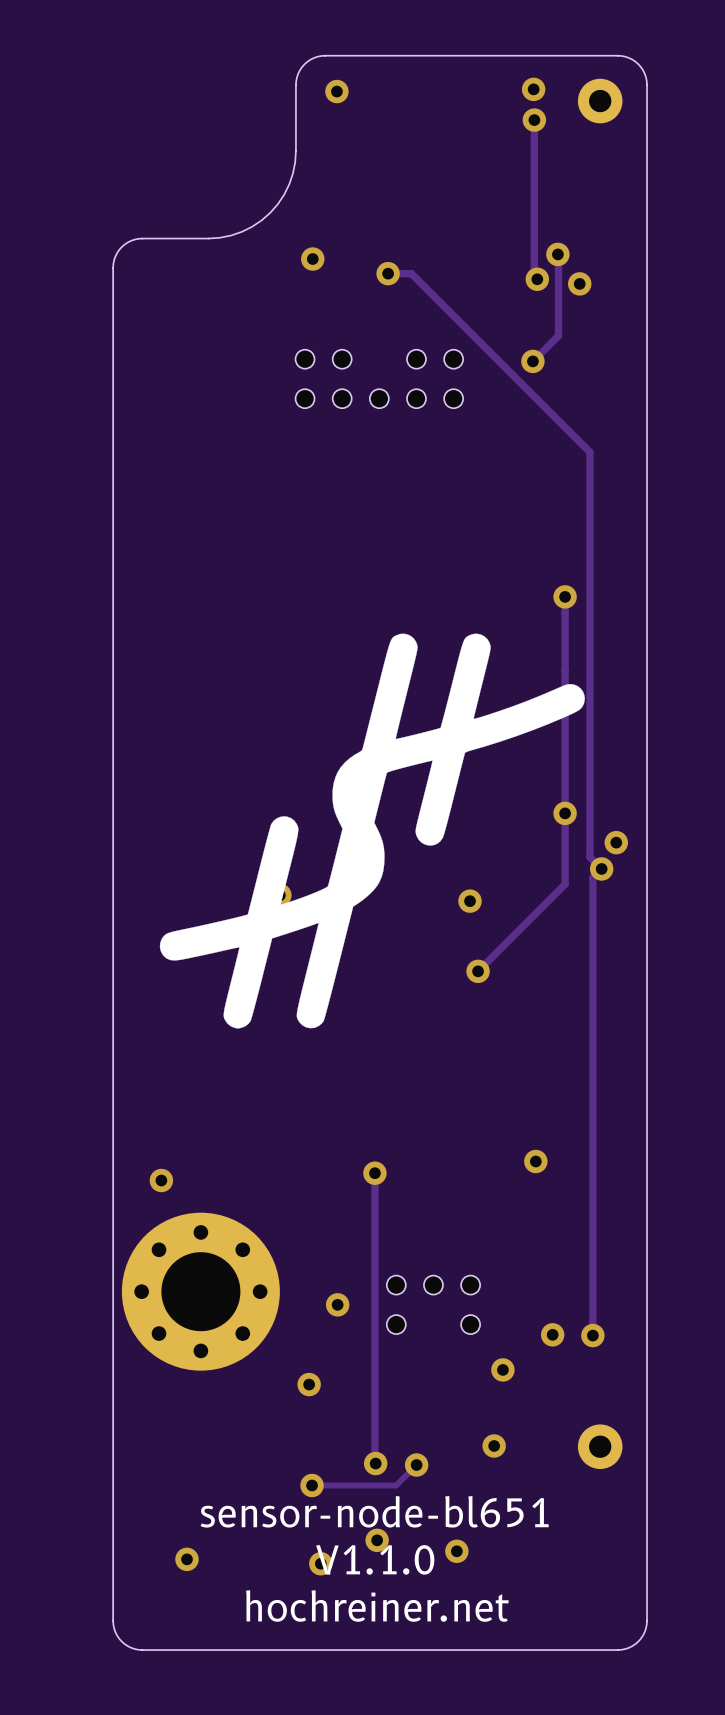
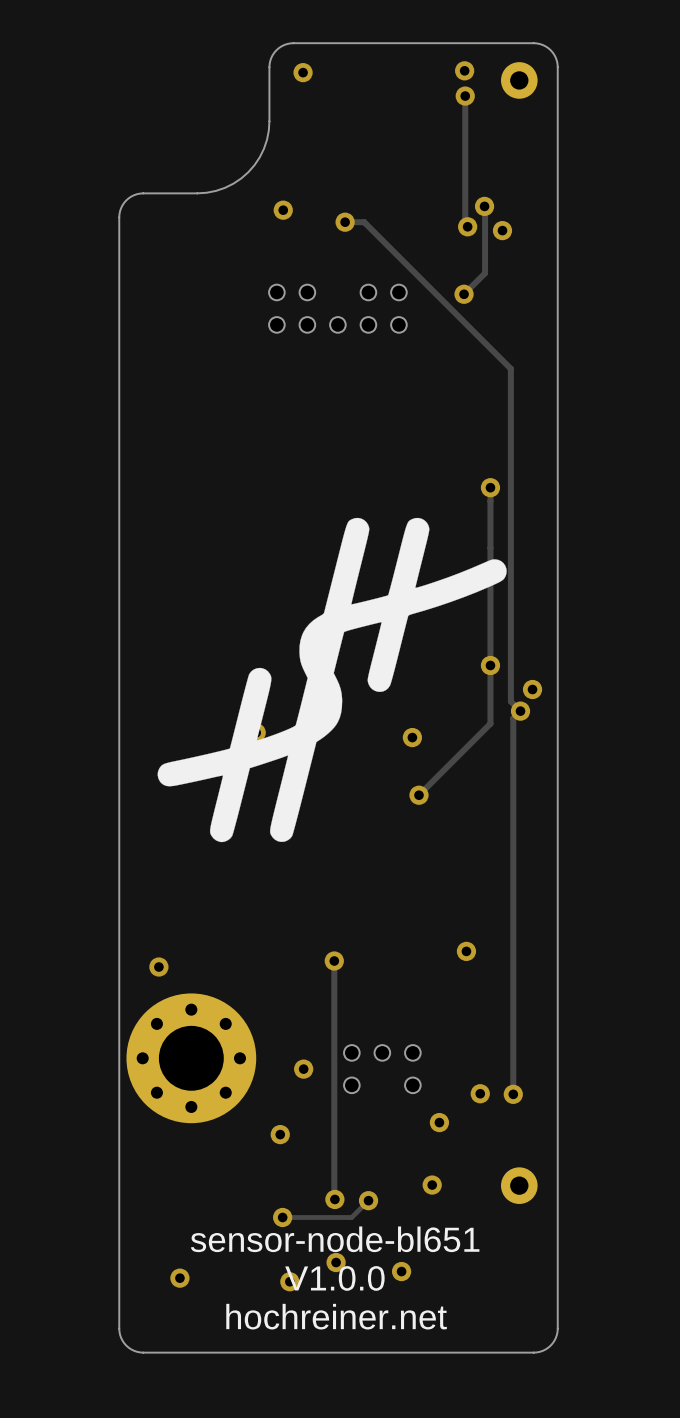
text: V1.1.0 (375, 1559) -> V1.0.0 (334, 1278)

